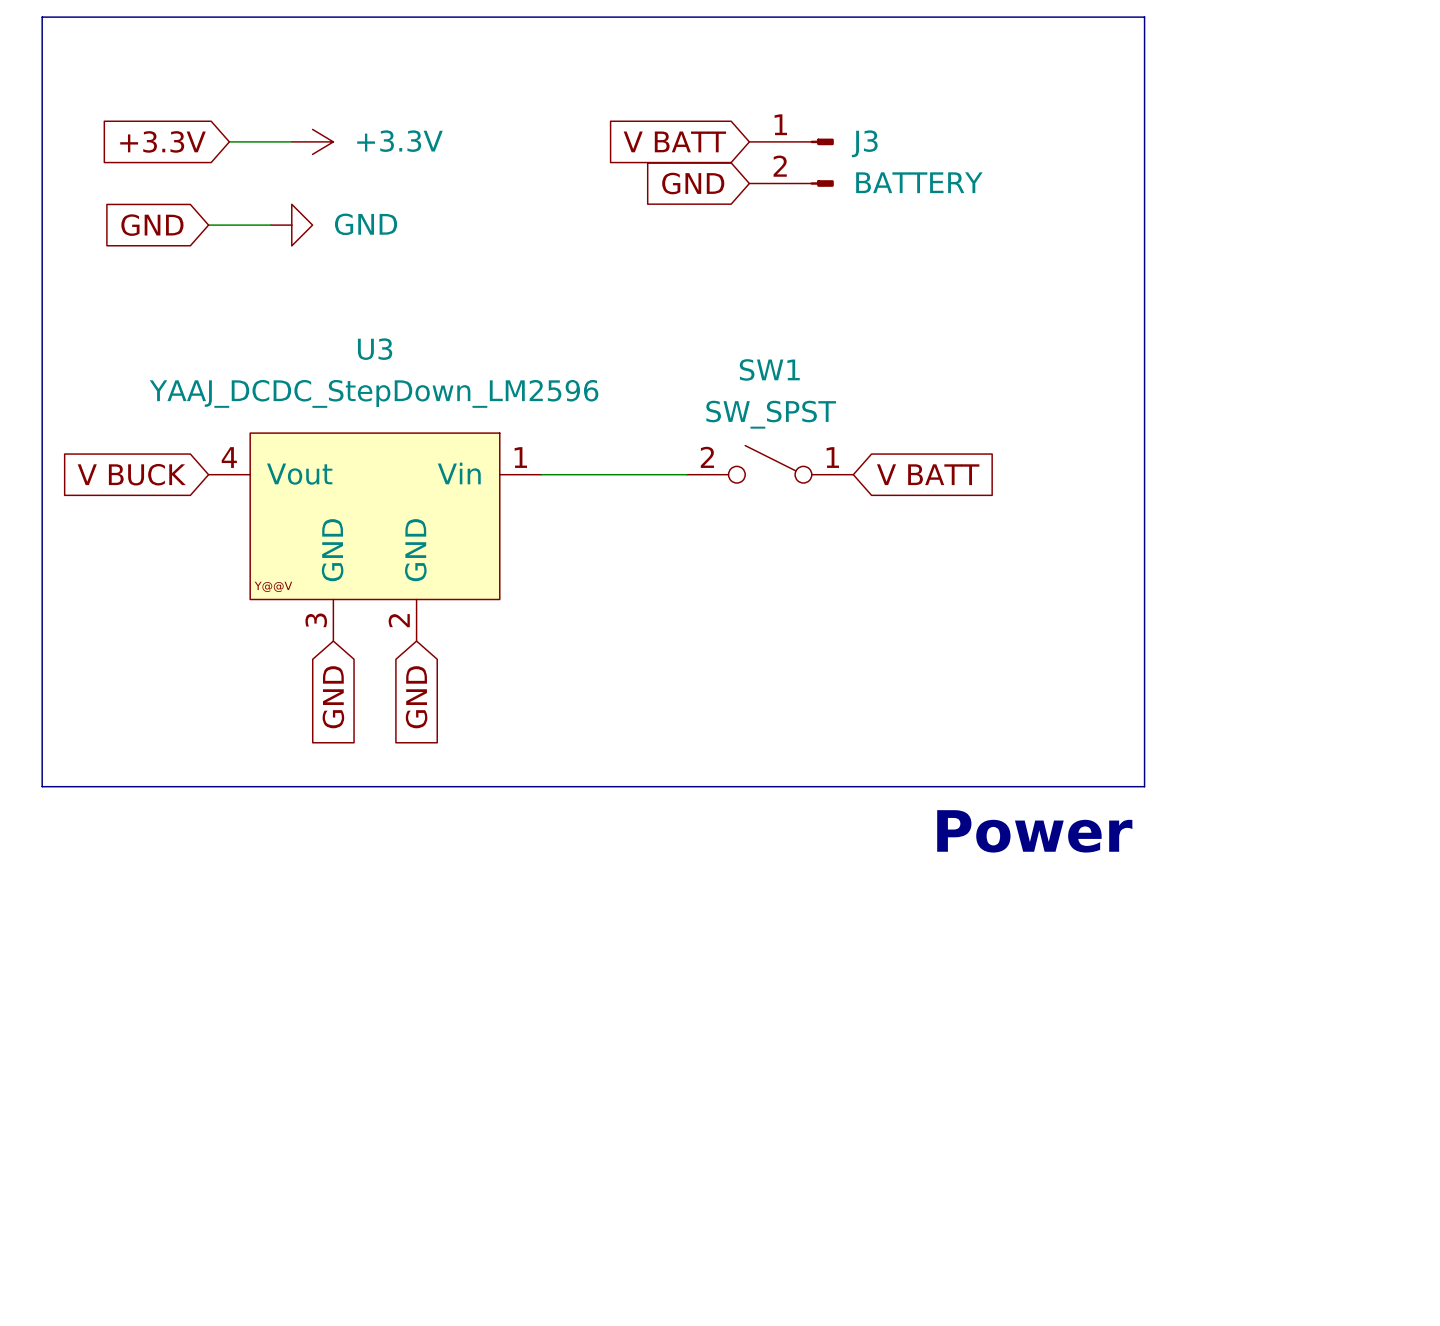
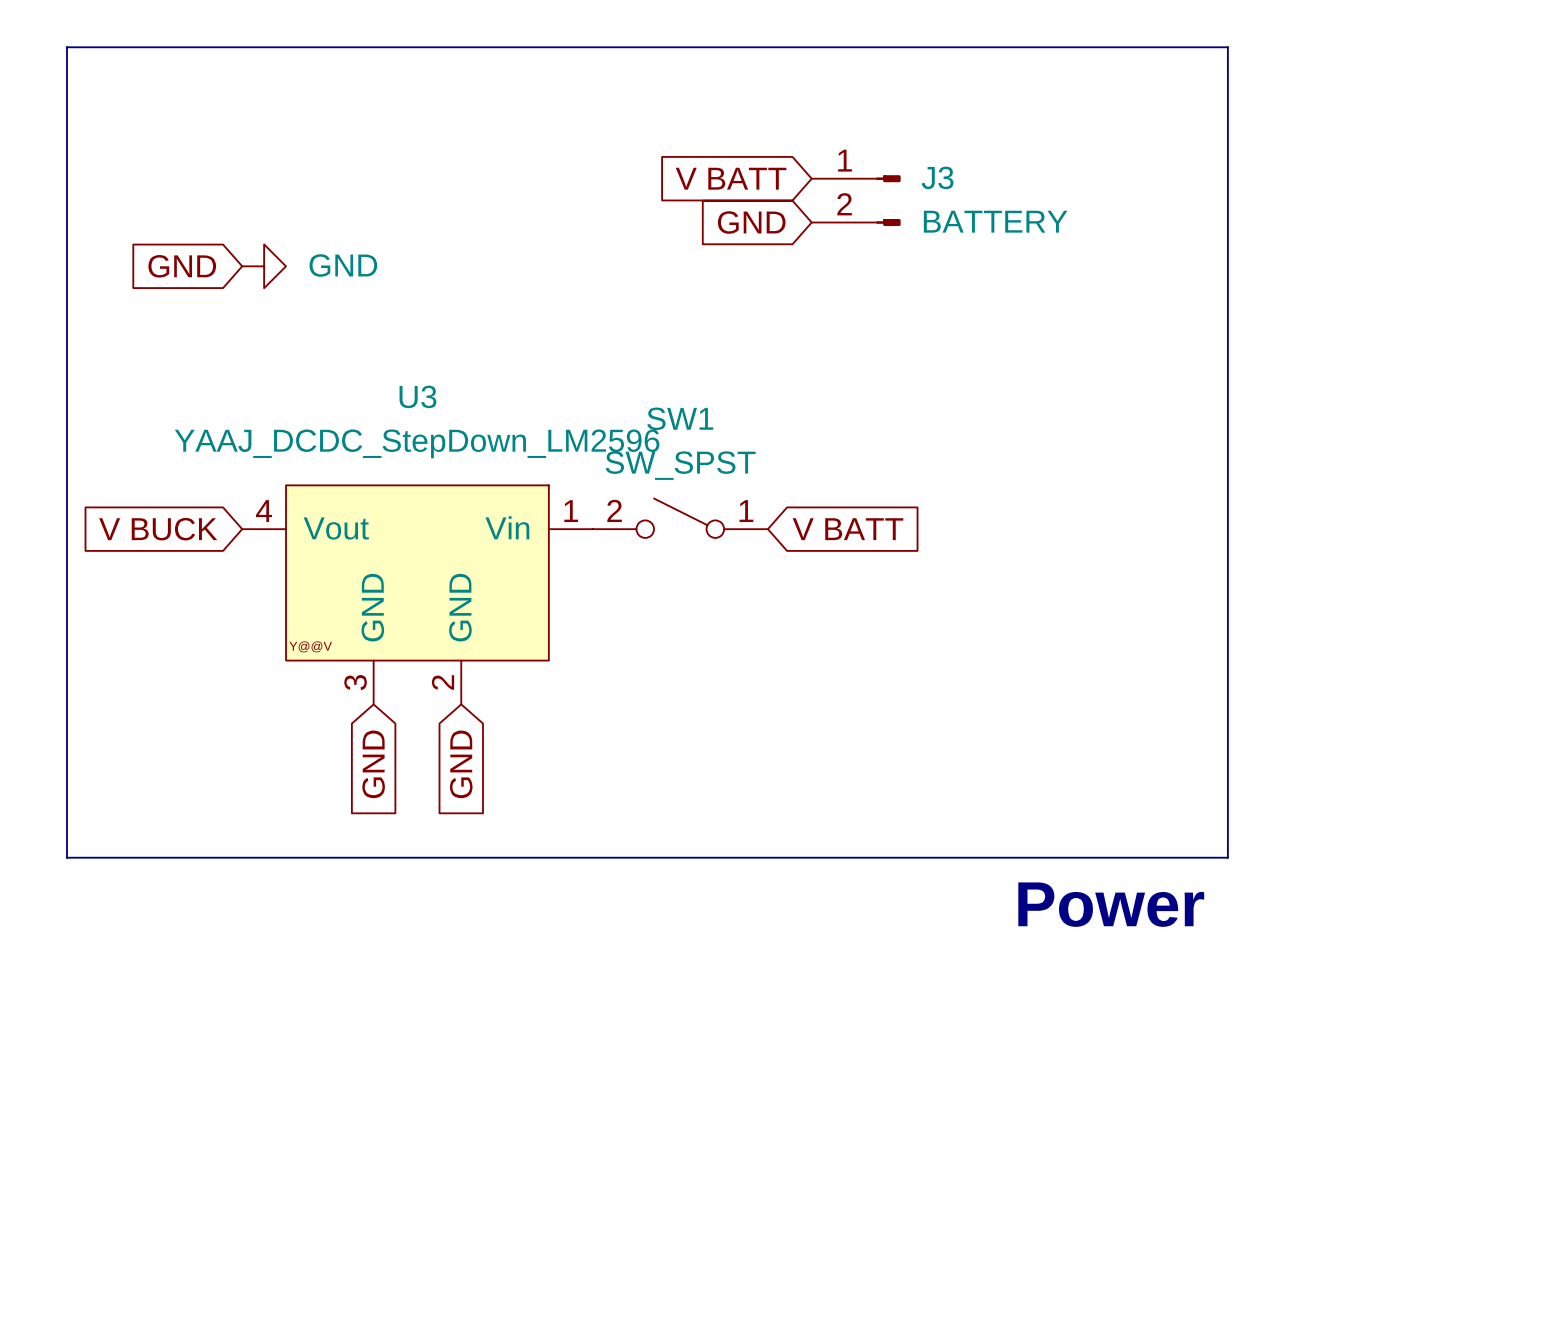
global label: +3.3V (162, 141) -> none
wire: (229, 141) (291, 141) -> none
power symbol: +3.3V (312, 141) -> none
wire: (208, 225) (270, 225) -> none
power symbol position: GND (291, 225) -> GND (264, 266)
SW1 position: (770, 464) -> (680, 518)
wire: (541, 474) (686, 474) -> none
global label position: V BATT (928, 474) -> V BATT (847, 529)

